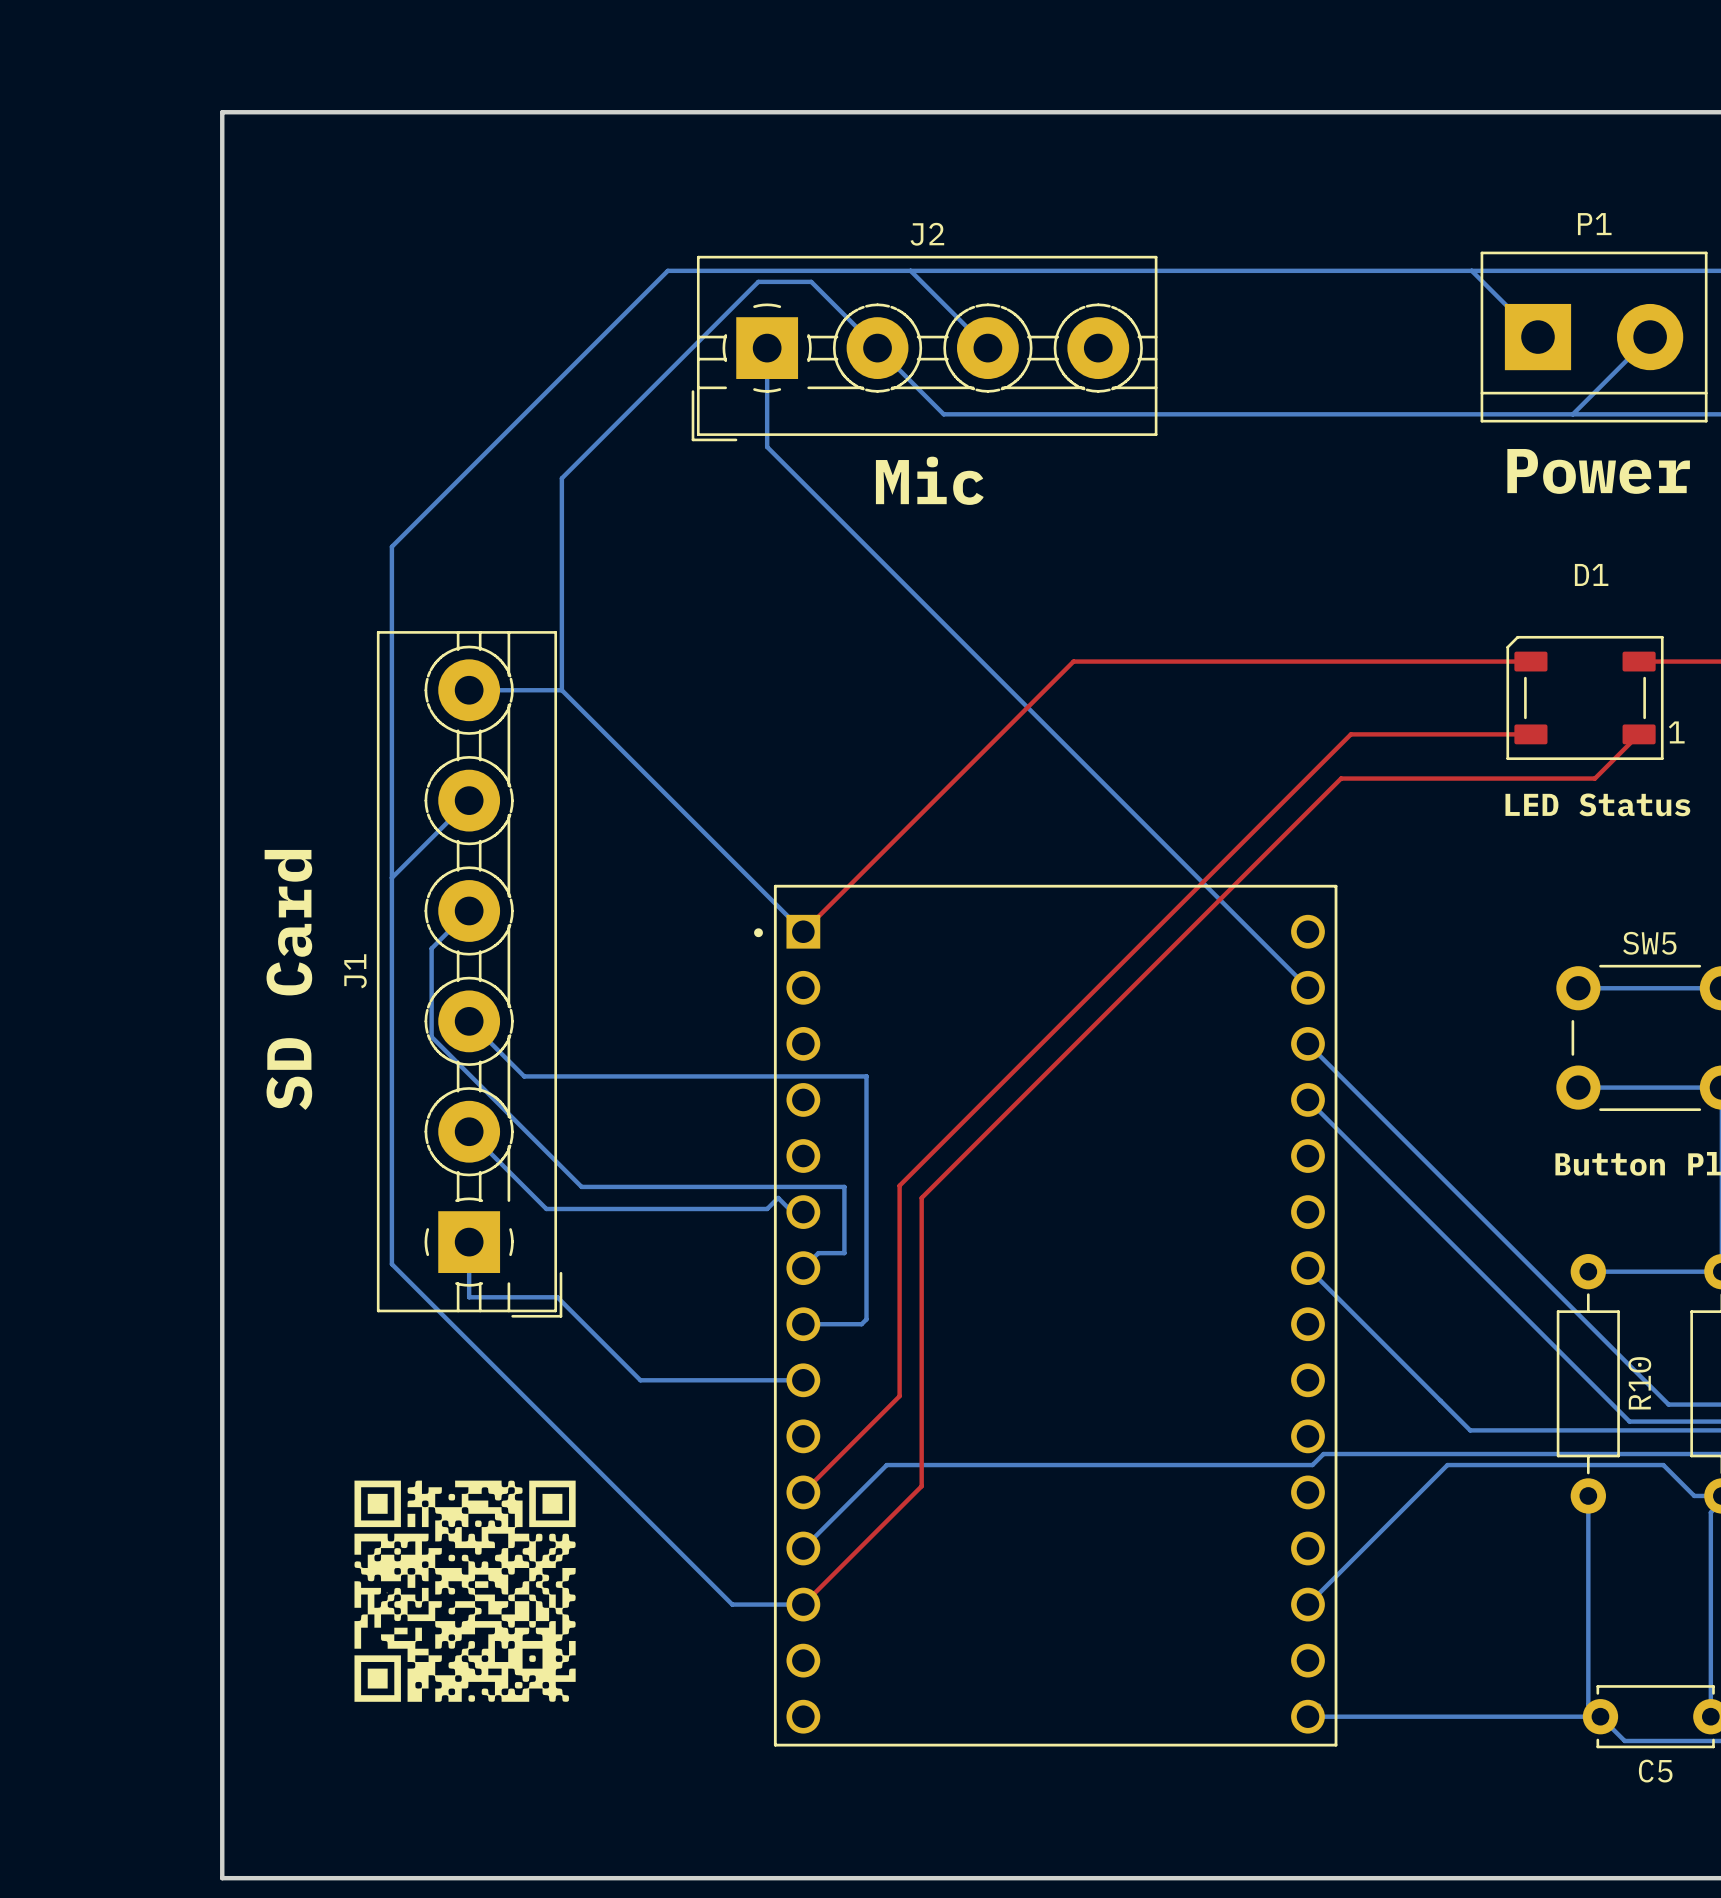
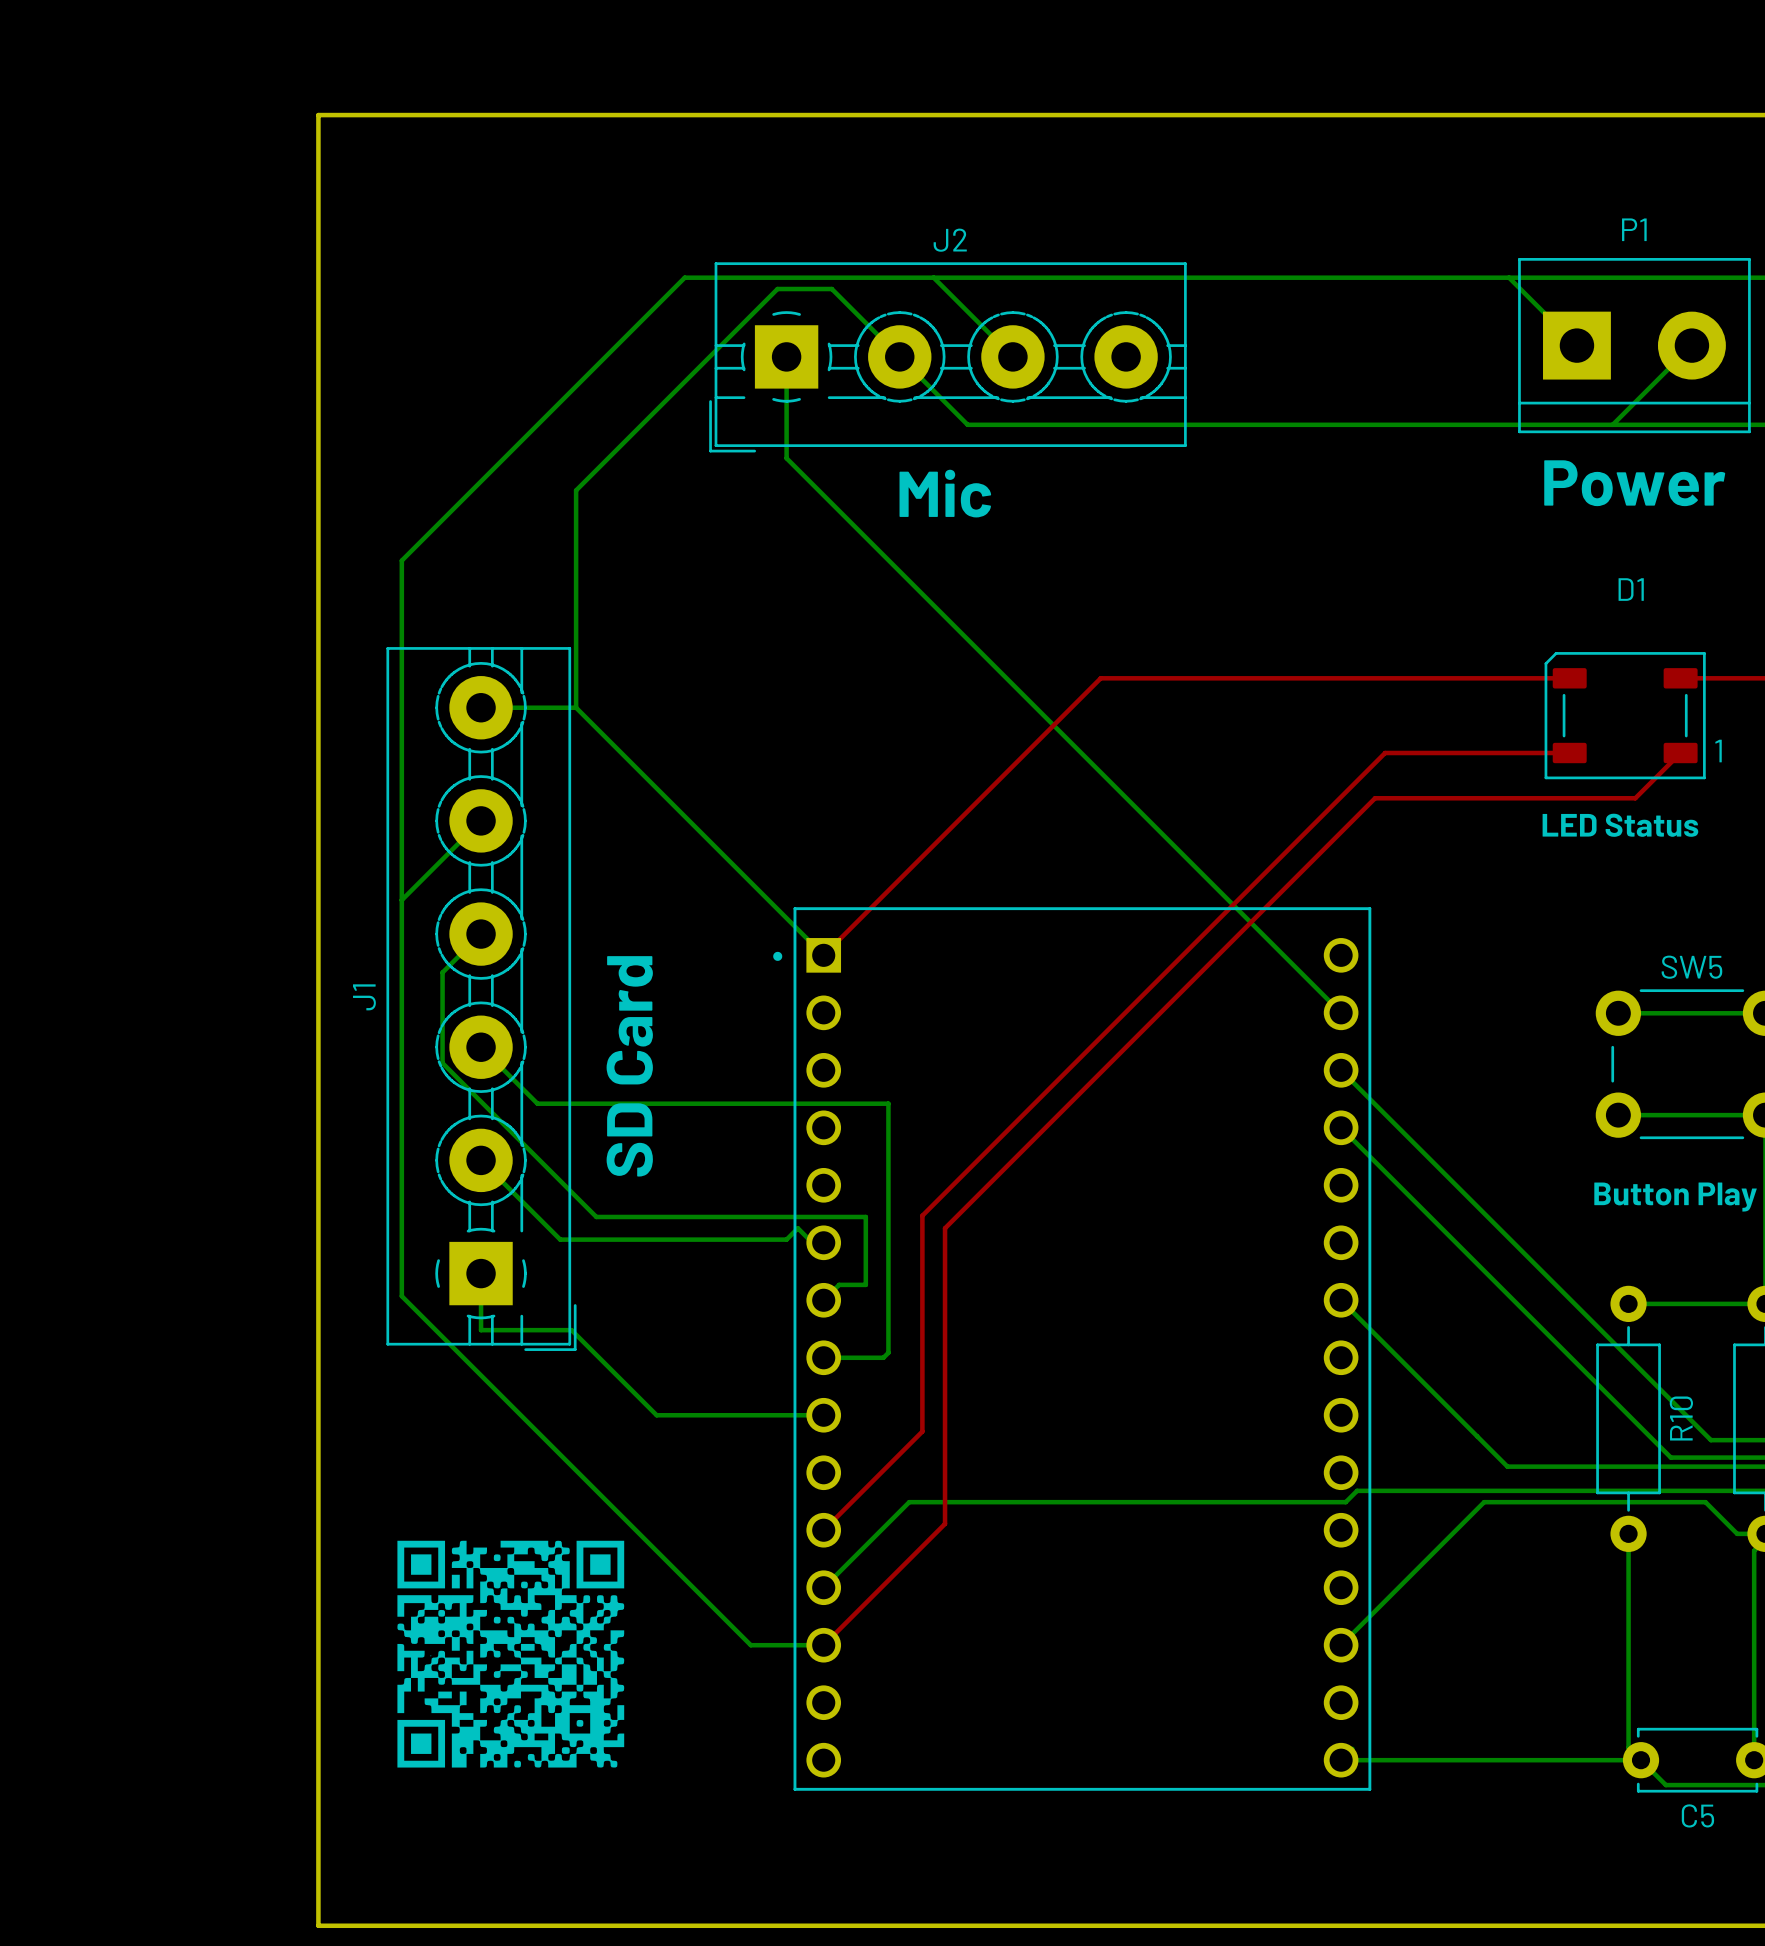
board edge: (310, 112) (222, 112) (222, 1878) (310, 1878) -> (318, 115) (318, 1925)
text position: SD Card (288, 979) -> SD Card (629, 1066)
drawing position: (465, 1591) -> (510, 1654)

